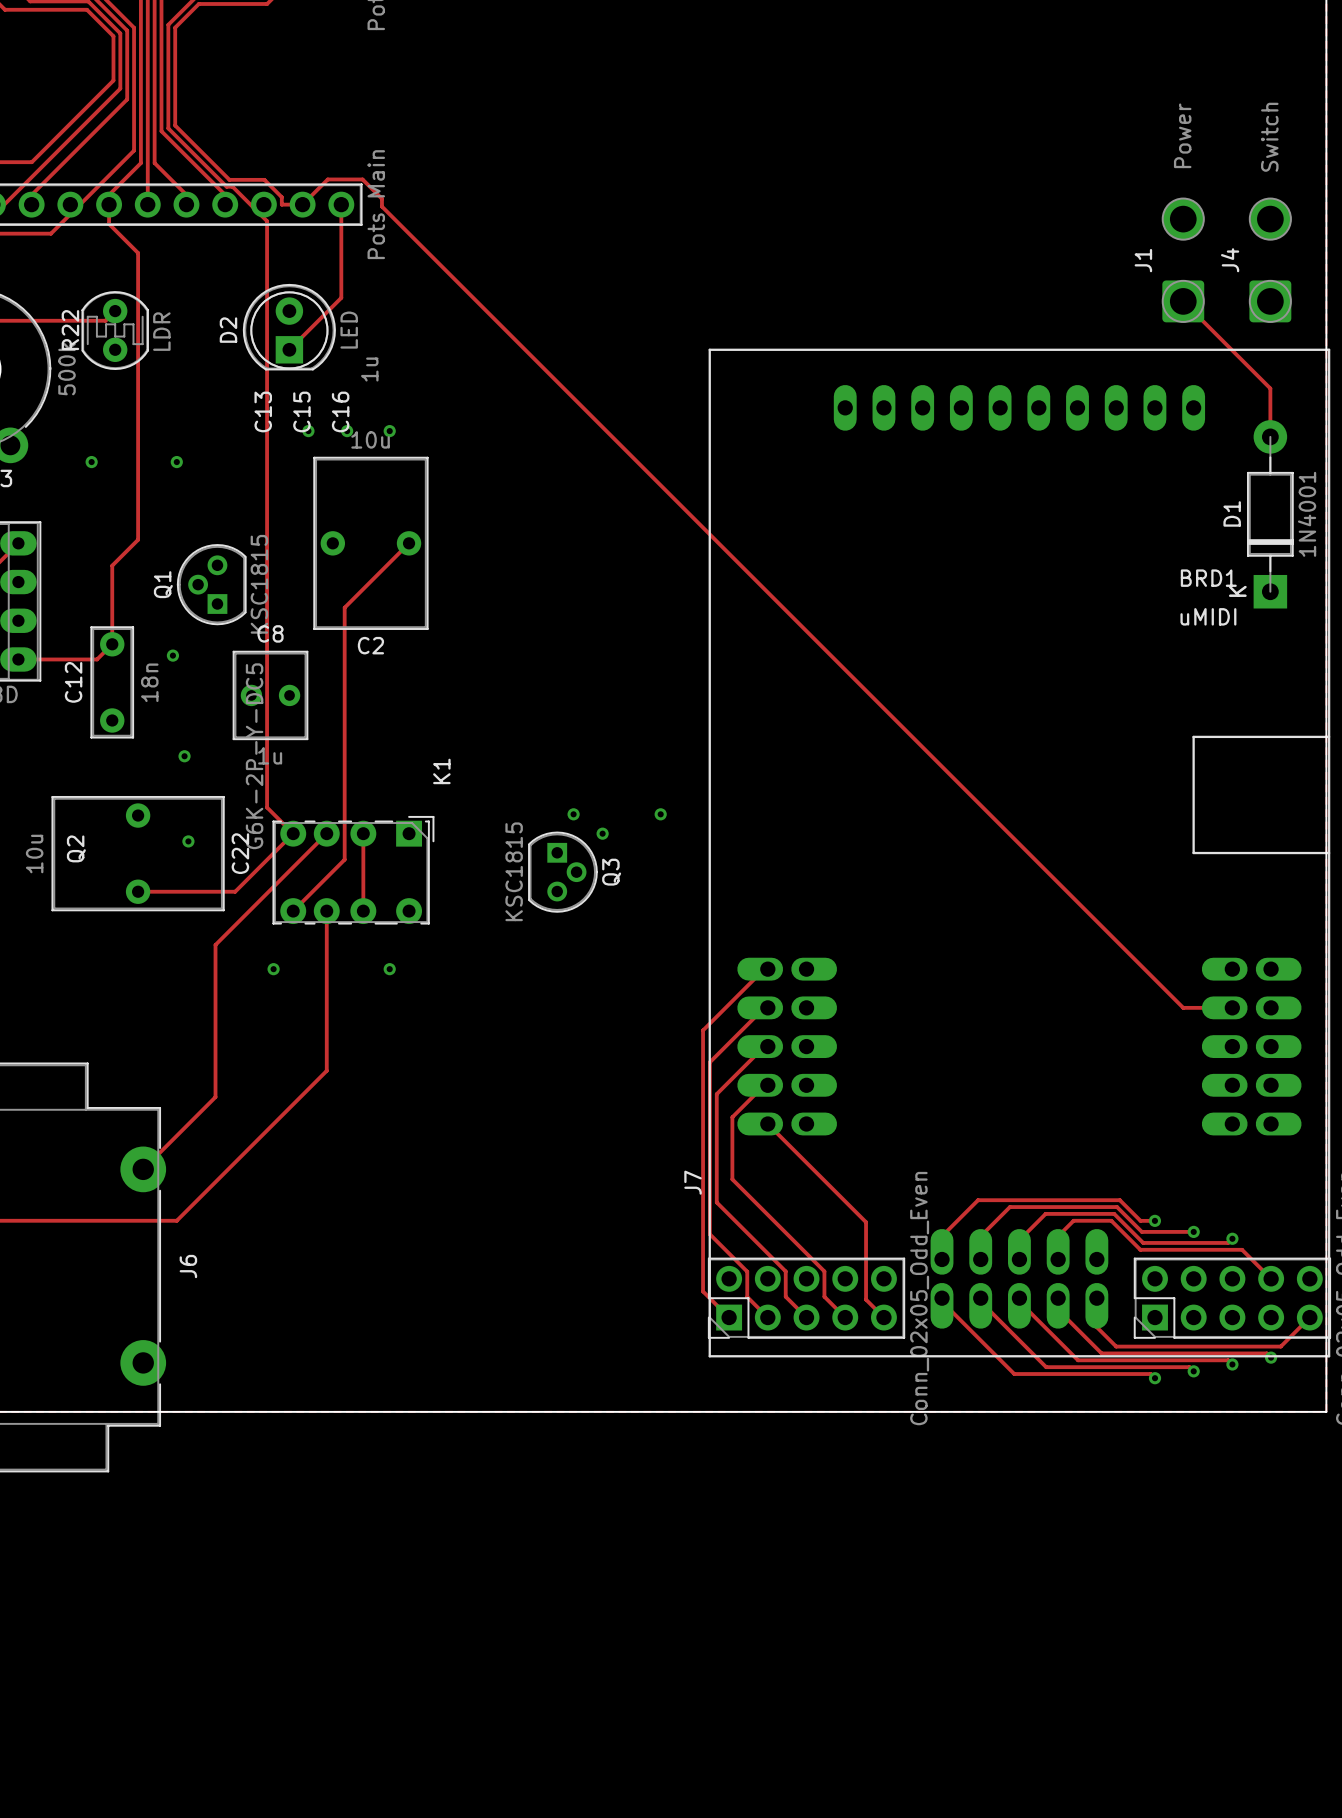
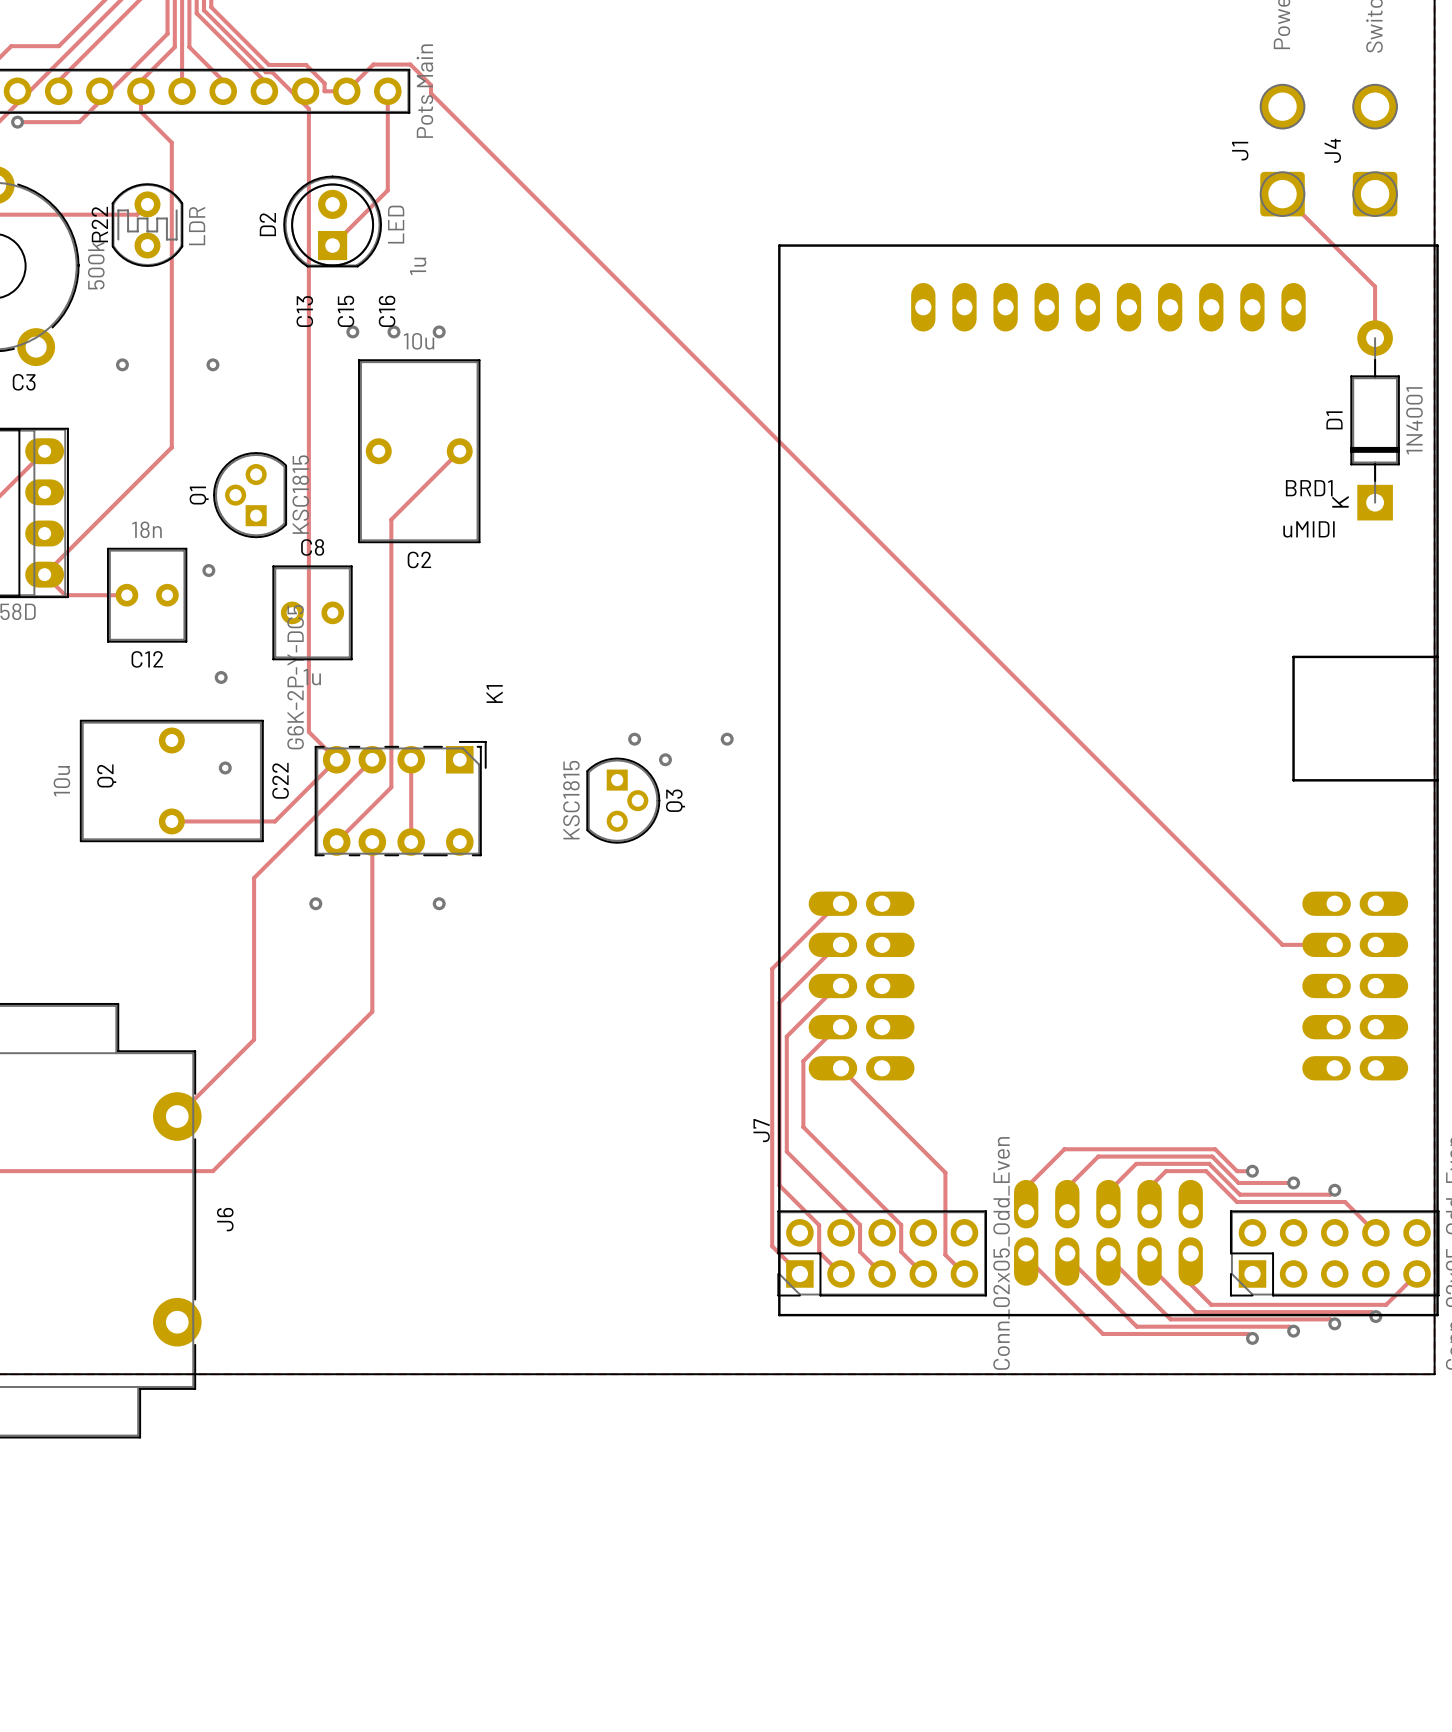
track: (112, 565) (112, 644) (97, 659) (18, 659) -> (144, 474) (44, 574) (65, 595) (126, 595)
C12 footprint: [90, 626, 135, 739] -> [107, 547, 188, 643]
C12 name position: C12 (73, 682) -> C12 (147, 659)
C12 value position: 18n (149, 682) -> 18n (146, 529)

